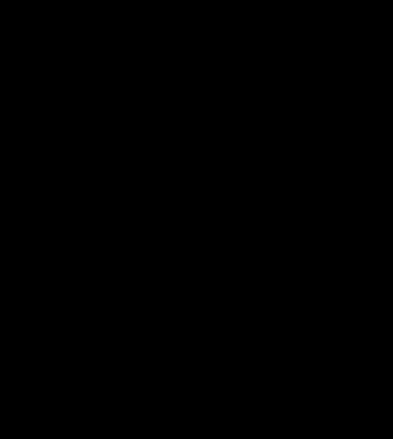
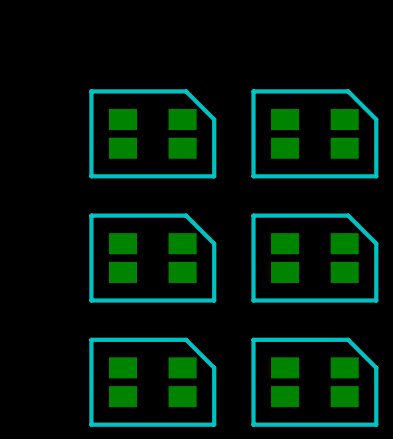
part: none -> (152, 133)
part: none -> (314, 133)
part: none -> (152, 258)
part: none -> (314, 258)
part: none -> (152, 382)
part: none -> (314, 382)

